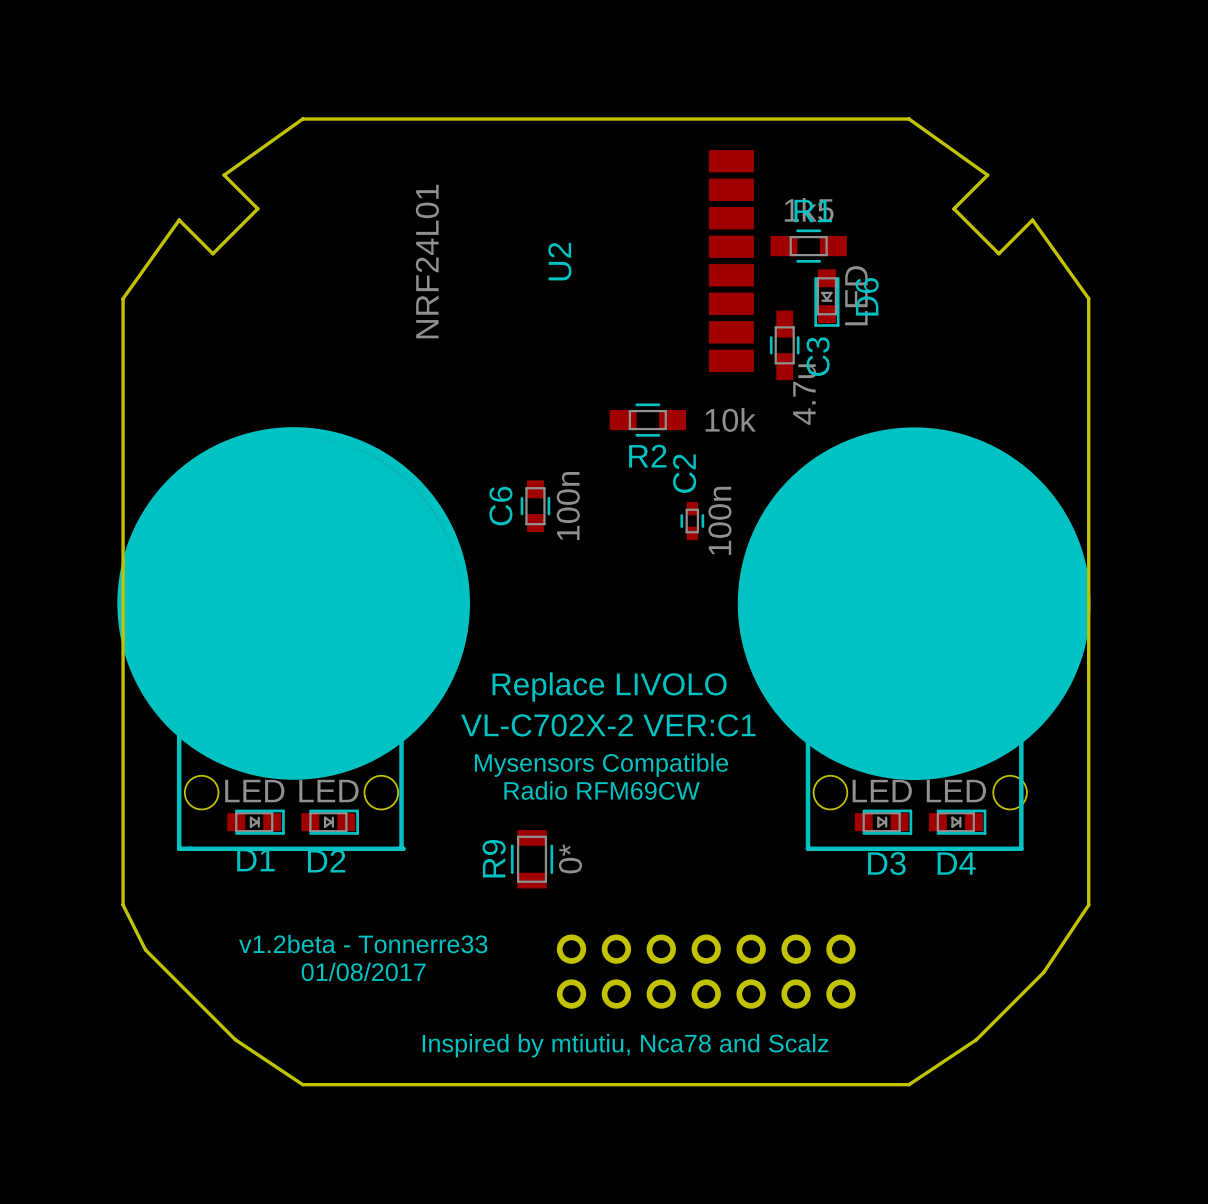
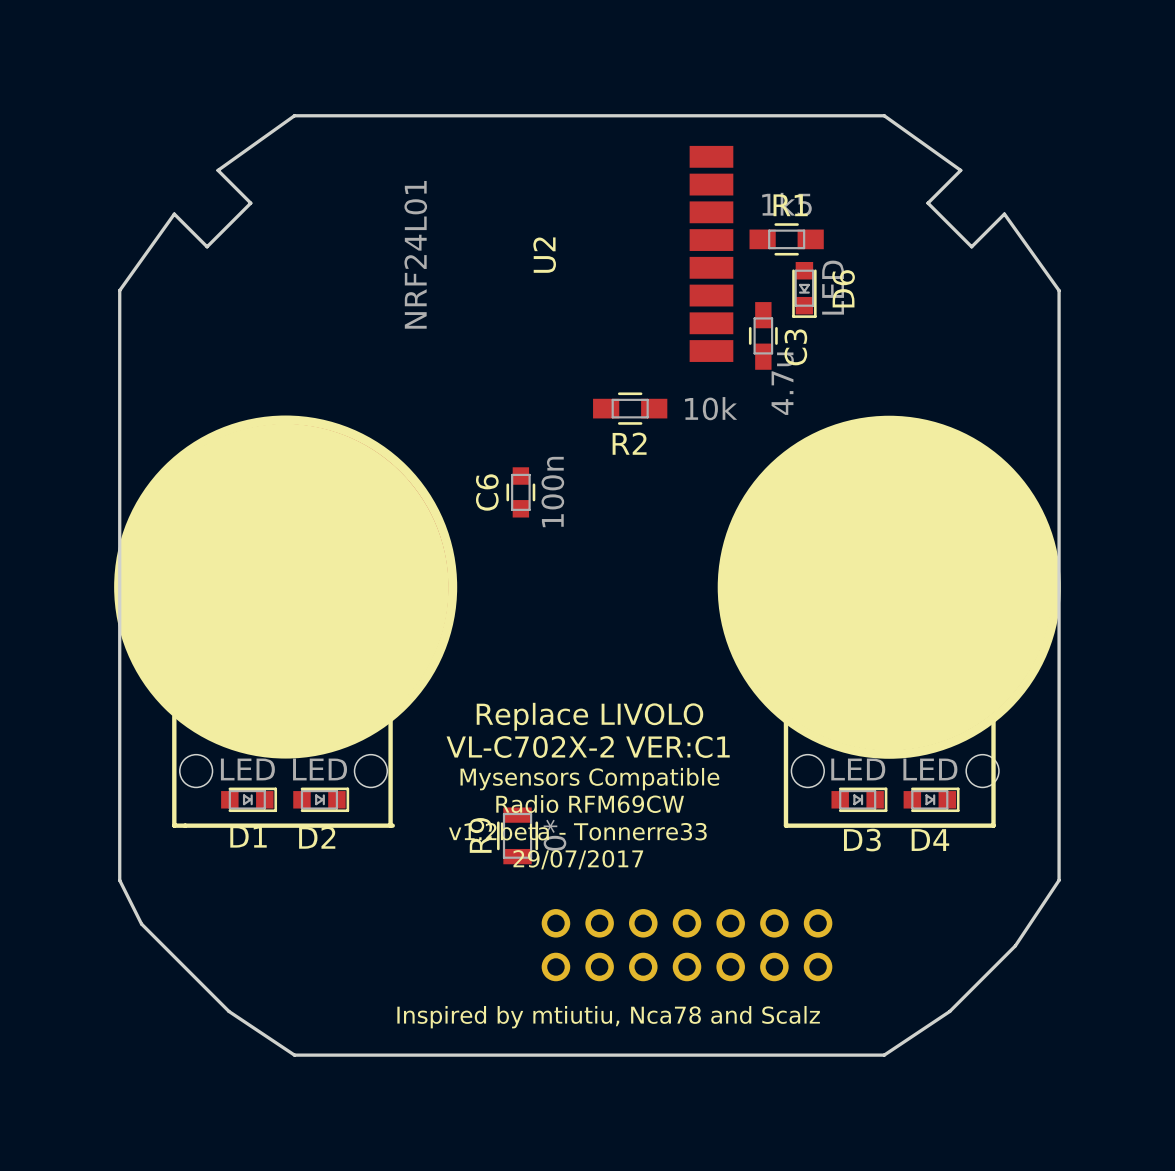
C2: 100n (692, 521) -> none
text: Replace LIVOLO (609, 687) -> none
text: VL-C702X-2 VER:C1 (608, 725) -> Replace LIVOLO (589, 716)
text: Mysensors Compatible (601, 765) -> VL-C702X-2 VER:C1 (588, 747)
text: Radio RFM69CW (602, 790) -> Mysensors Compatible (589, 779)
text: none -> Radio RFM69CW (590, 804)
text: none -> 29/07/2017 (578, 859)
text position: v1.2beta - Tonnerre33 (363, 943) -> v1.2beta - Tonnerre33 (577, 831)
text: 01/08/2017 (363, 971) -> none

